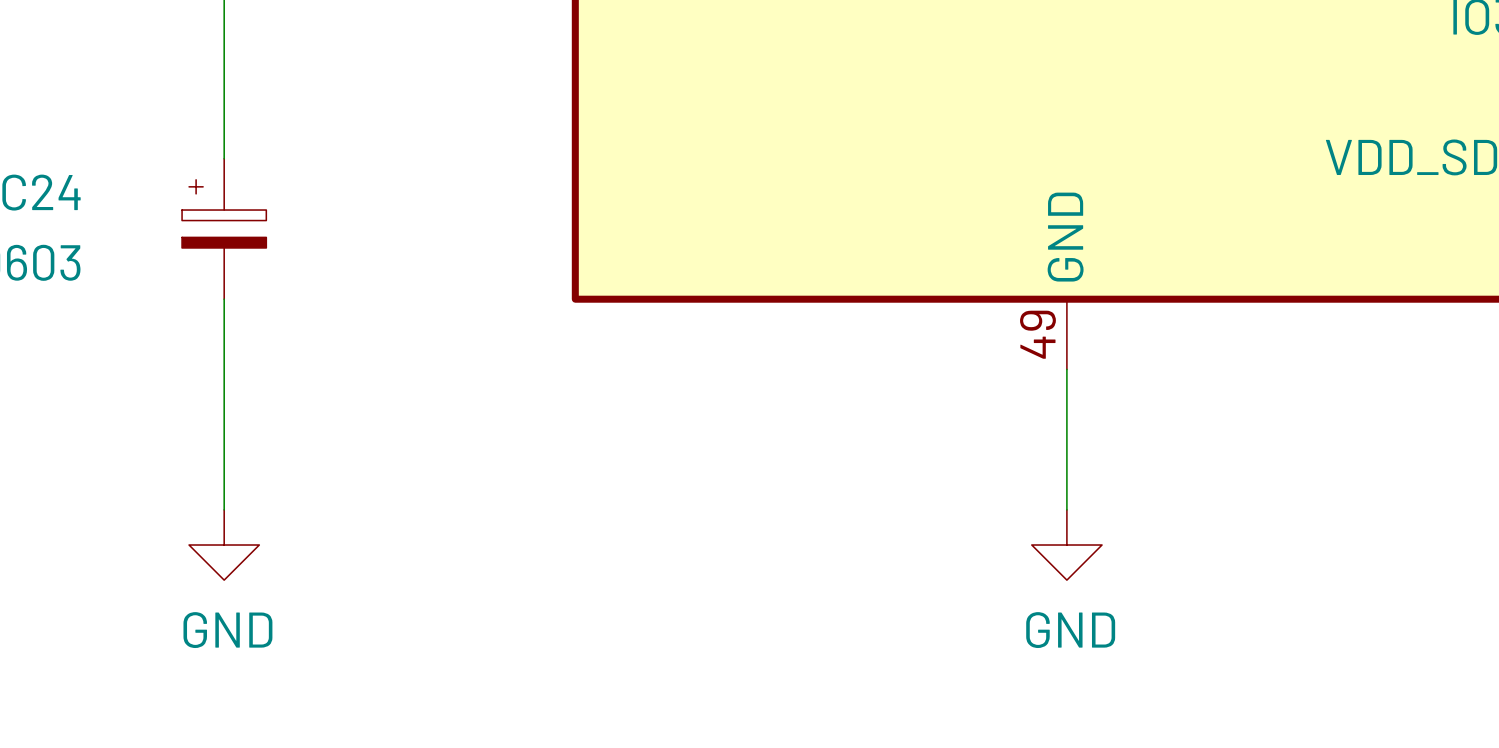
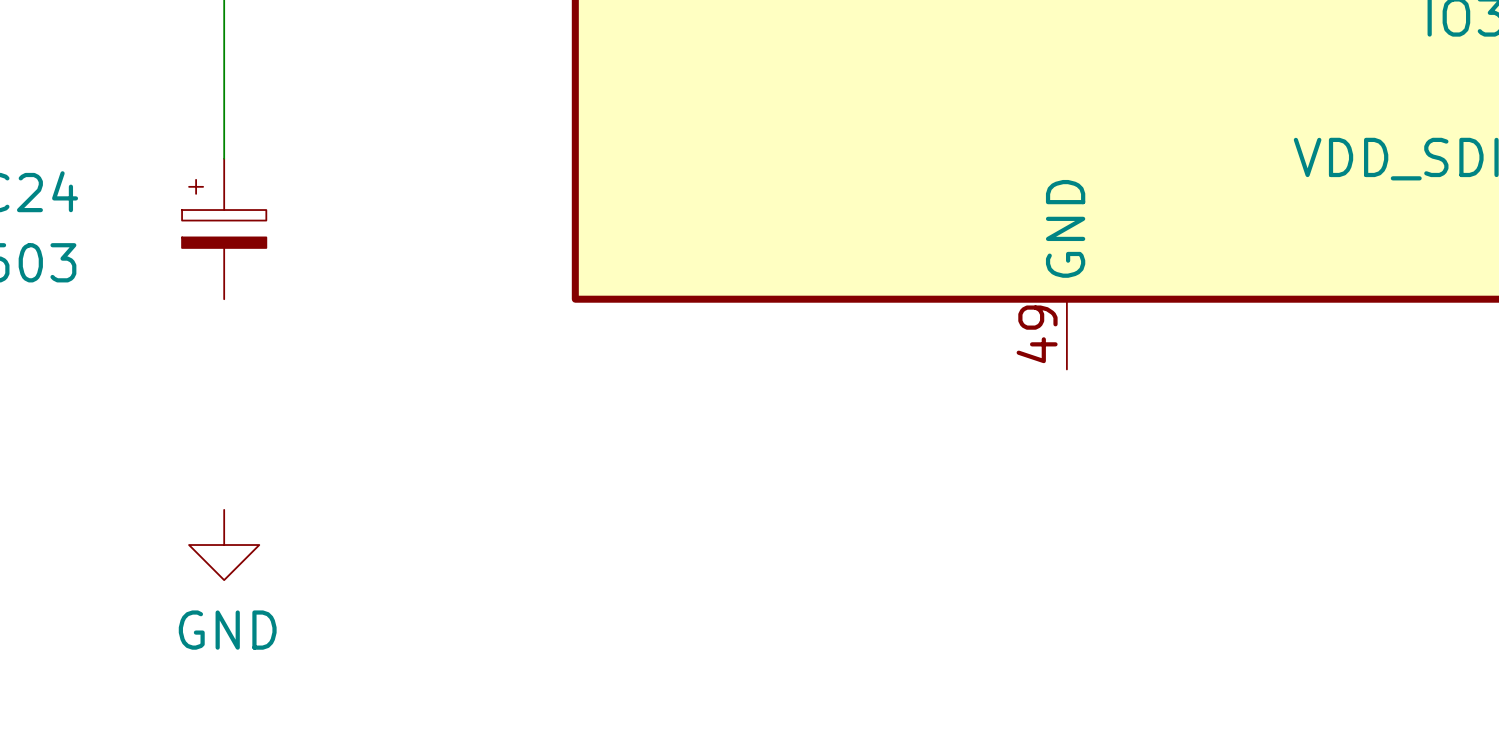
wire: (224, 299) (224, 509) -> none
wire: (1066, 369) (1066, 509) -> none
power symbol: GND (1066, 545) -> none

